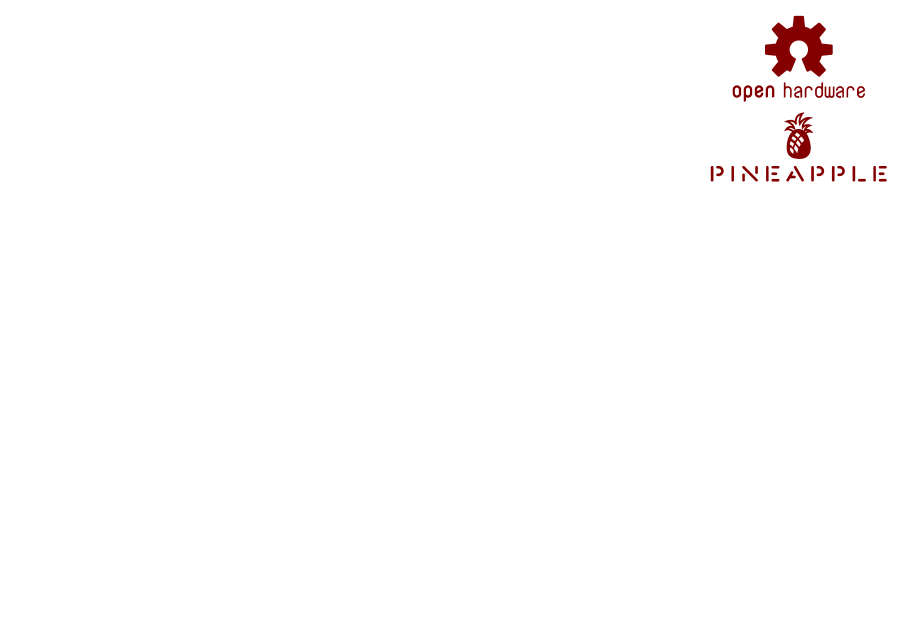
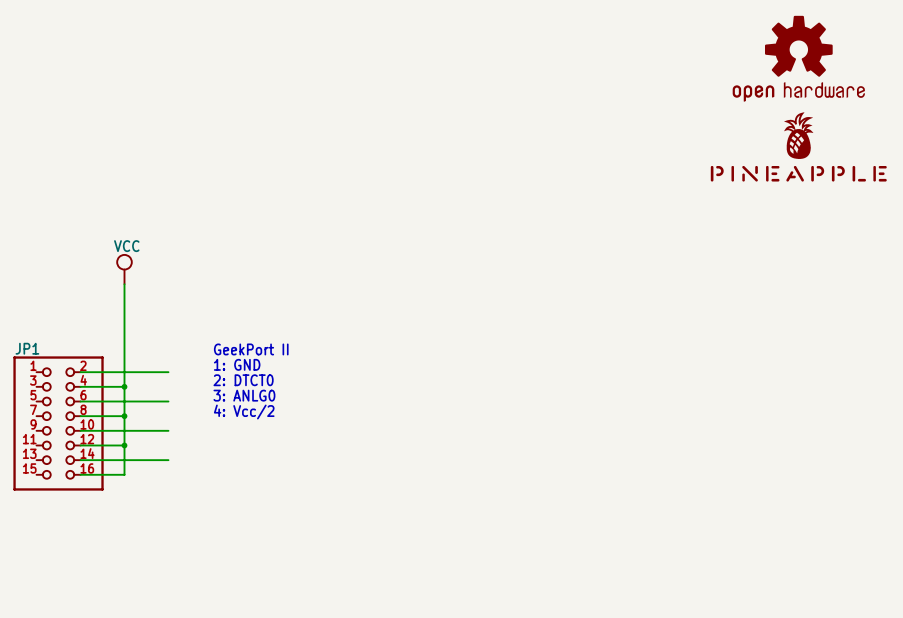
power symbol: none -> VCC (124, 269)
wire: none -> (124, 284) (124, 474) (80, 474)
text: none -> GeekPort II (251, 349)
text: none -> 1: GND (237, 364)
wire: none -> (80, 372) (168, 372)
text: none -> 2: DTCT0 (243, 380)
wire: none -> (80, 386) (124, 386)
junction: none -> (124, 386)
text: none -> 3: ANLG0 (244, 395)
wire: none -> (80, 401) (168, 401)
text: none -> 4: Vcc/2 (244, 412)
wire: none -> (80, 416) (124, 416)
junction: none -> (124, 416)
JP1: none -> (58, 423)
wire: none -> (80, 430) (168, 430)
wire: none -> (80, 445) (124, 445)
junction: none -> (124, 445)
wire: none -> (80, 460) (168, 460)

